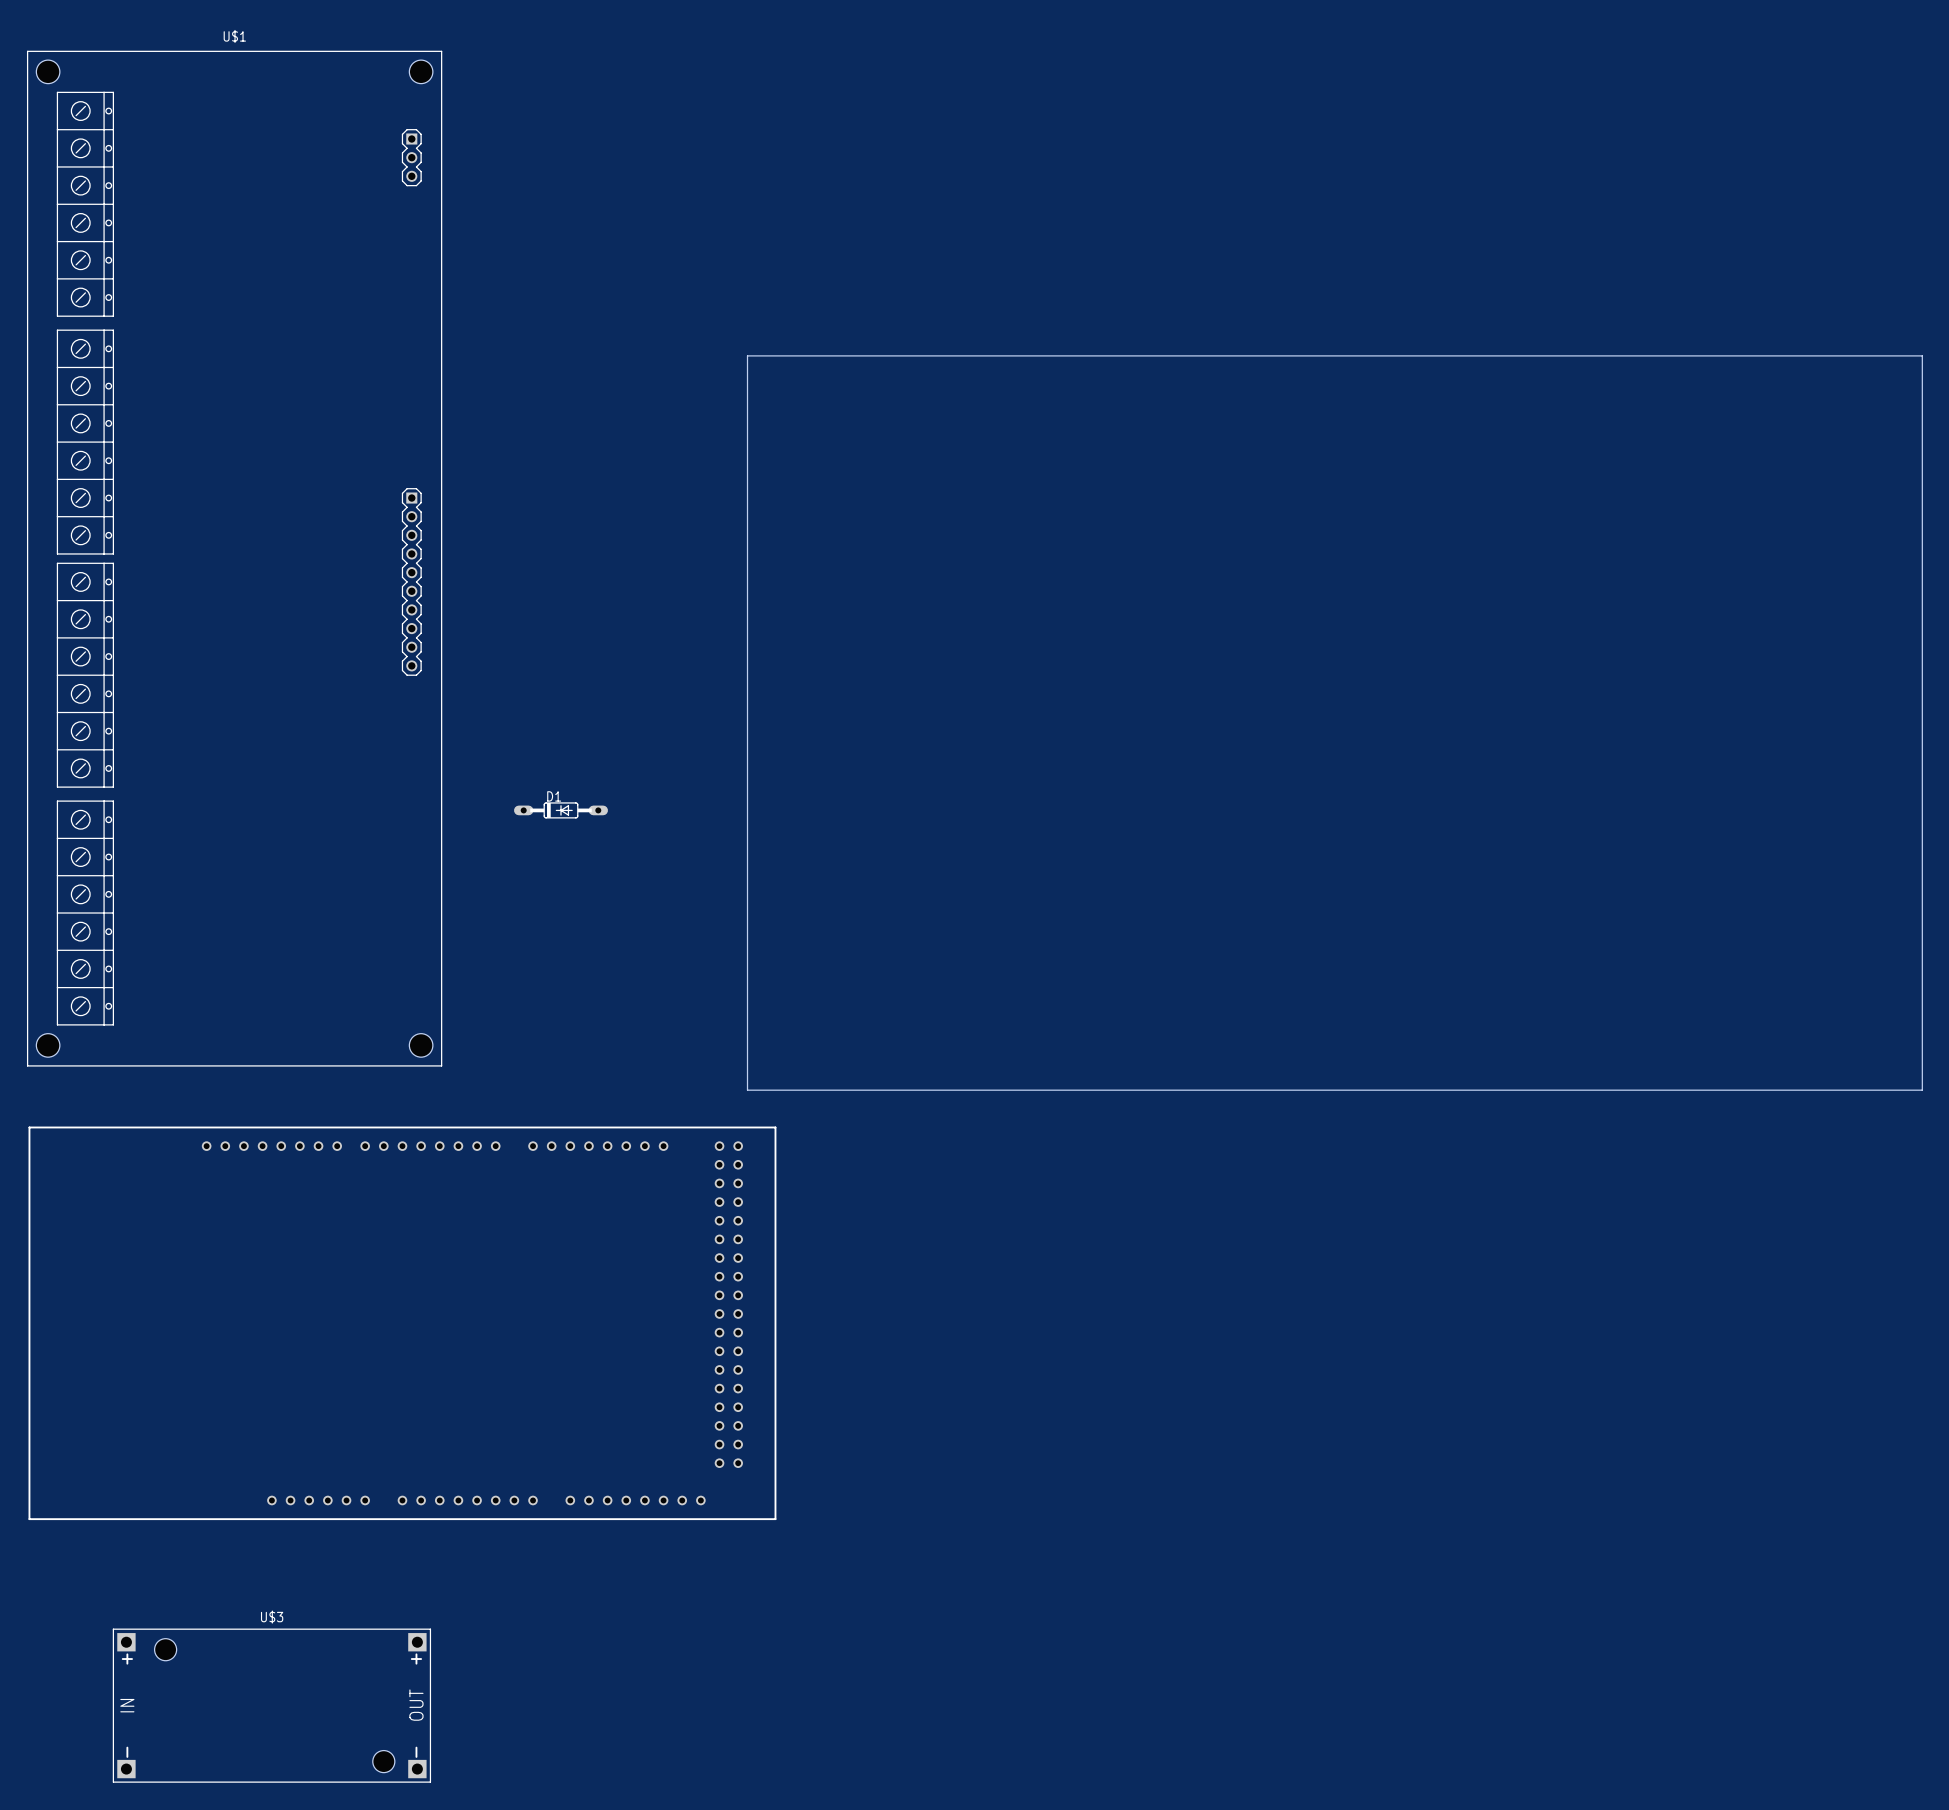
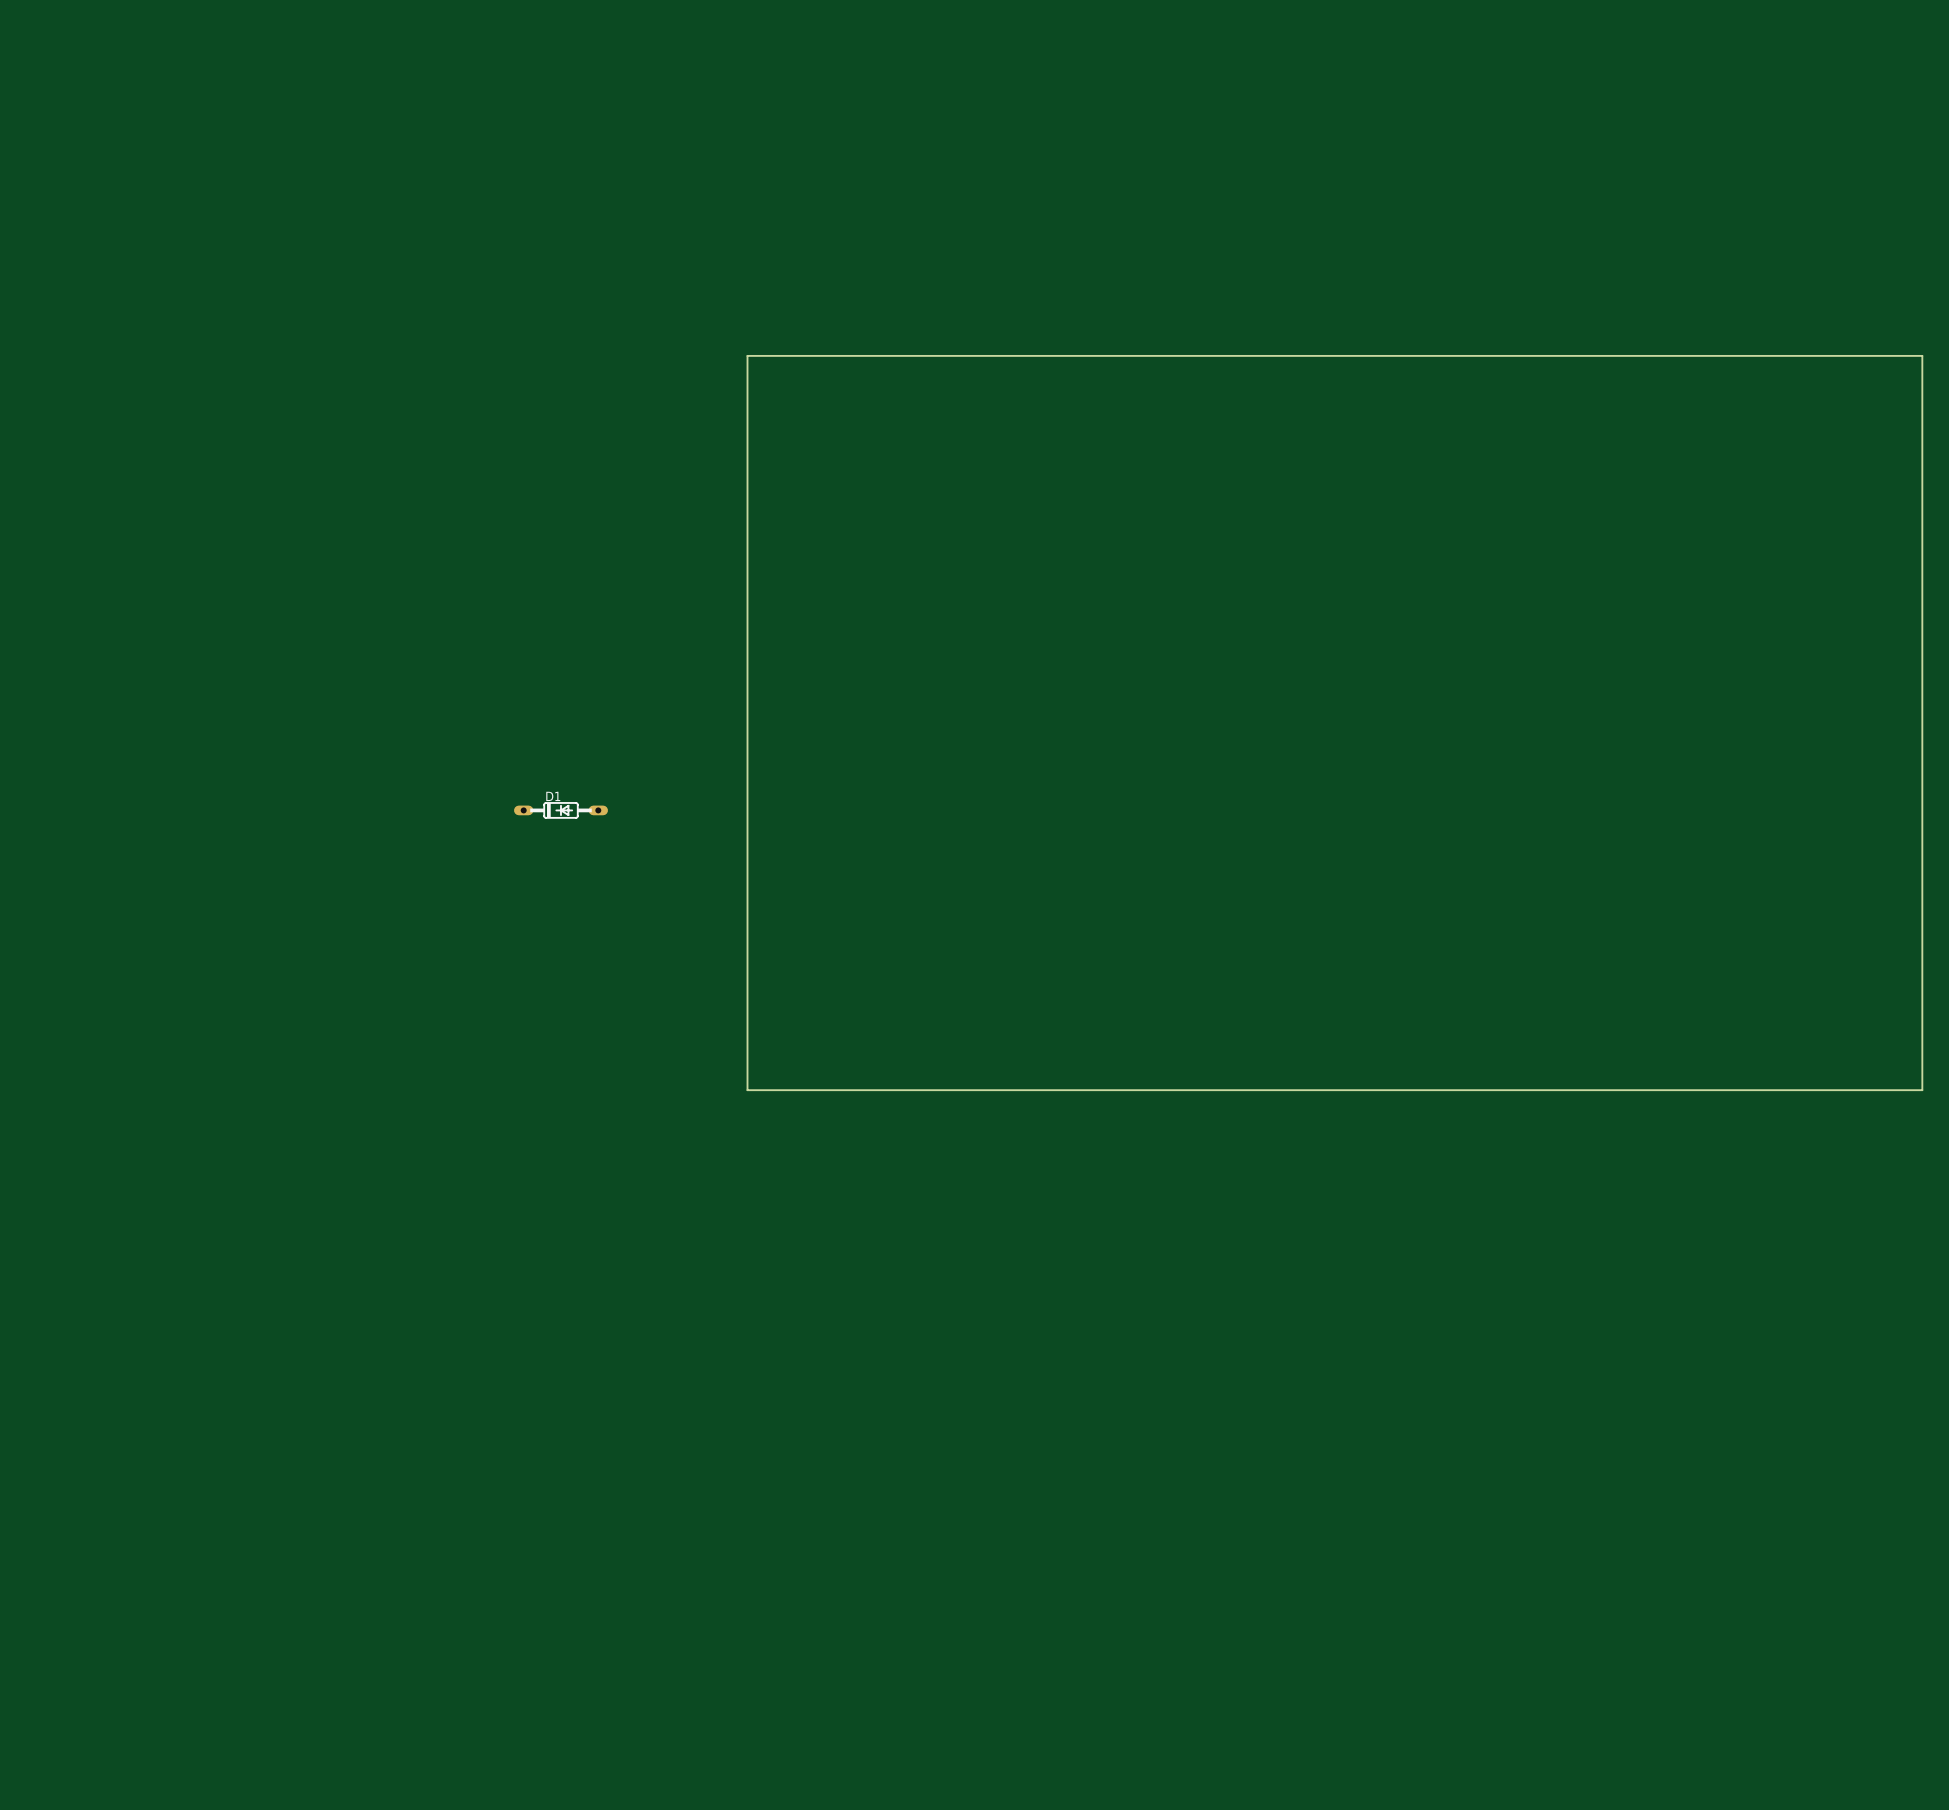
U$1: (234, 558) -> none
part: (402, 1323) -> none
U$3: (271, 1705) -> none

